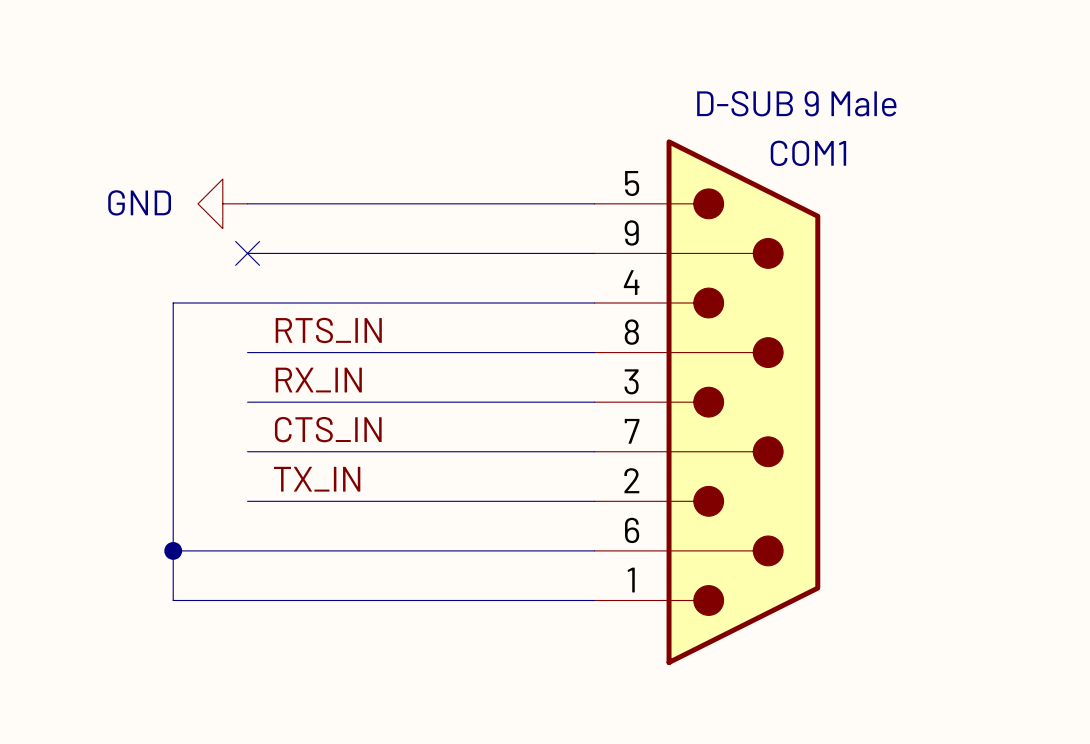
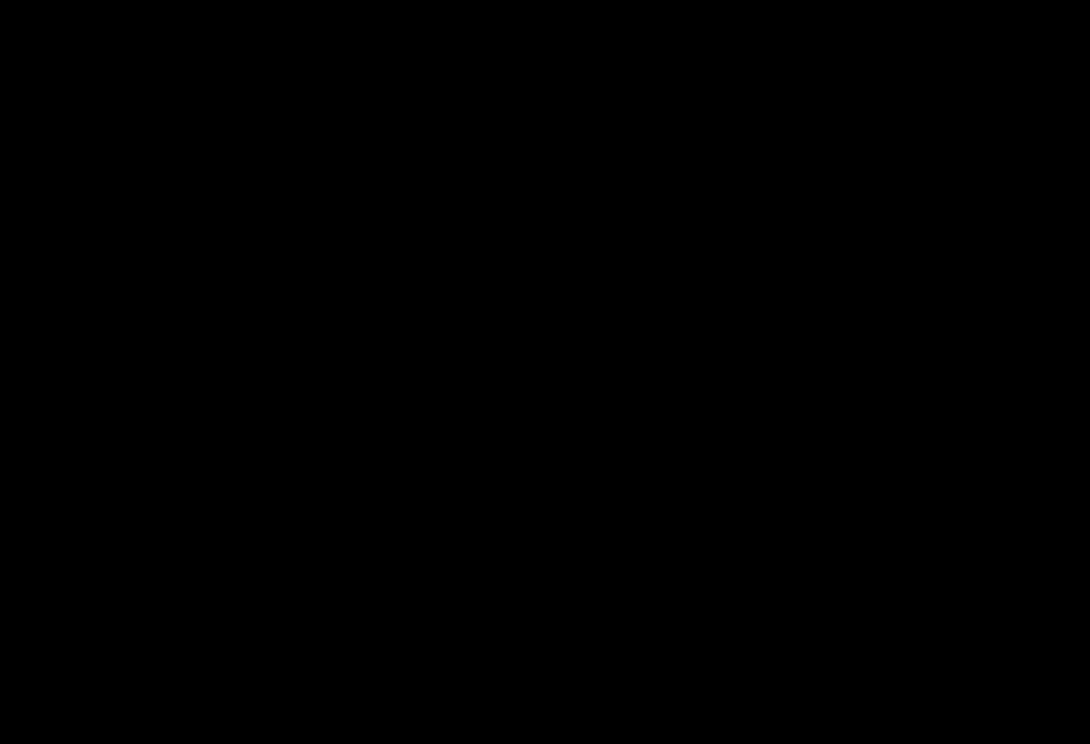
power symbol: GND (222, 203) -> none
wire: (247, 203) (594, 203) -> none
wire: (247, 253) (594, 253) -> none
no-connect mark: (247, 253) -> none
wire: (594, 303) (173, 303) (173, 600) (594, 600) -> none
label: RTS_IN (328, 330) -> none
wire: (247, 352) (594, 352) -> none
label: RX_IN (318, 380) -> none
wire: (247, 402) (594, 402) -> none
COM1: D-SUB 9 Male (707, 402) -> none
label: CTS_IN (328, 429) -> none
wire: (247, 451) (594, 451) -> none
label: TX_IN (317, 479) -> none
wire: (247, 501) (594, 501) -> none
wire: (173, 550) (594, 550) -> none
junction: (173, 550) -> none

